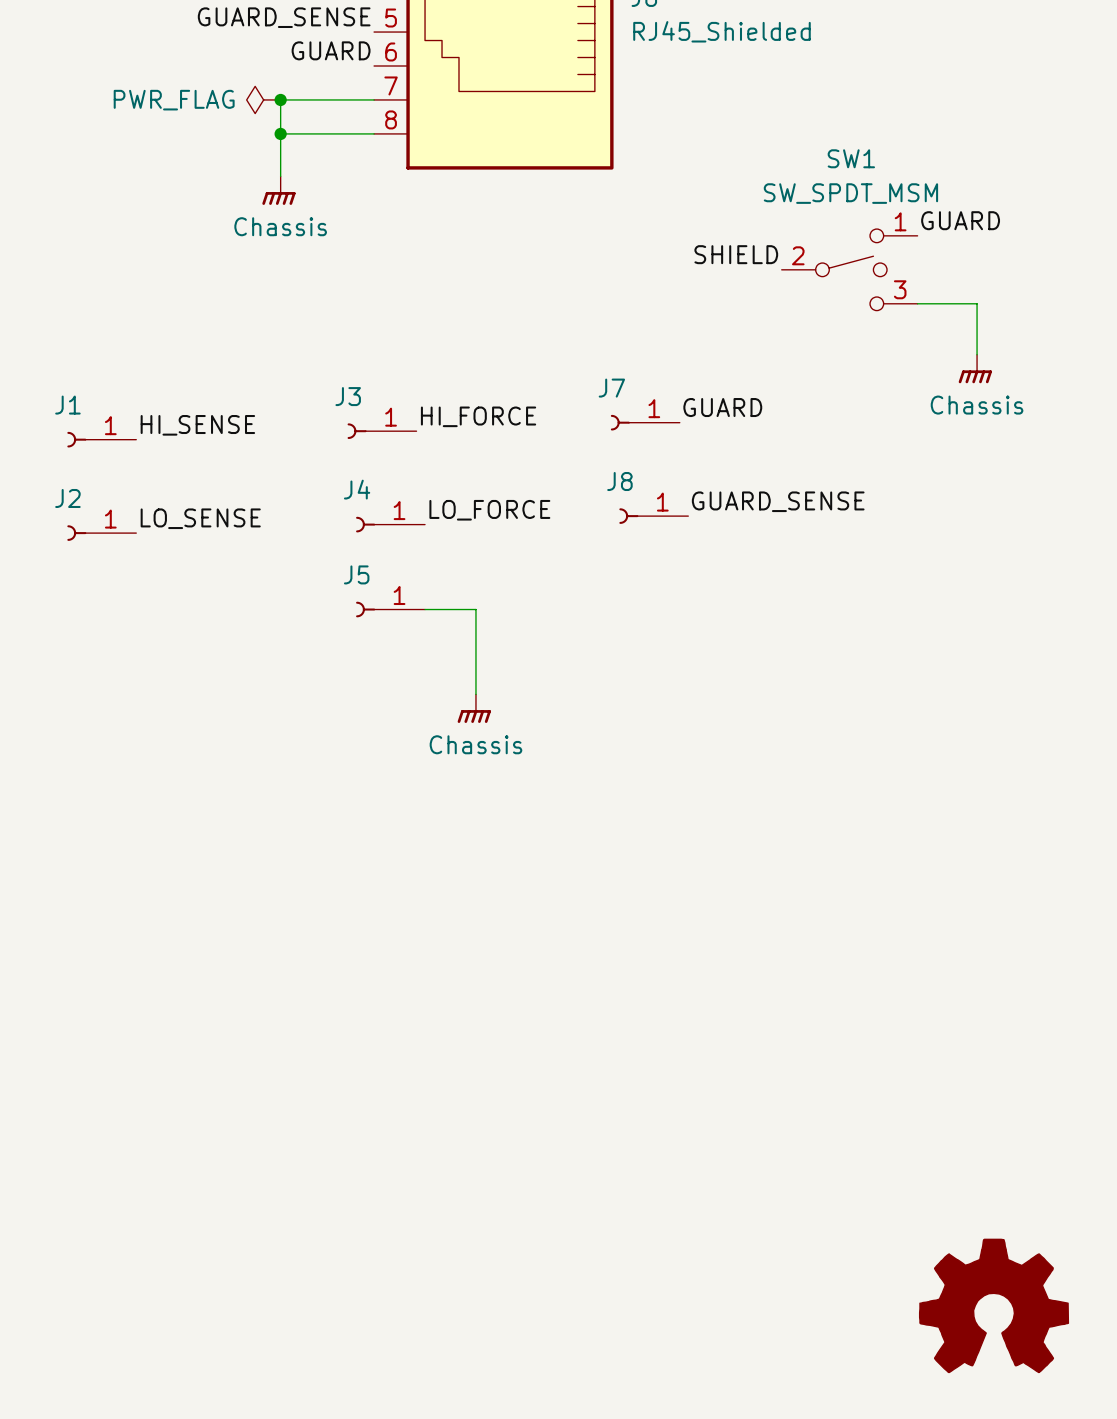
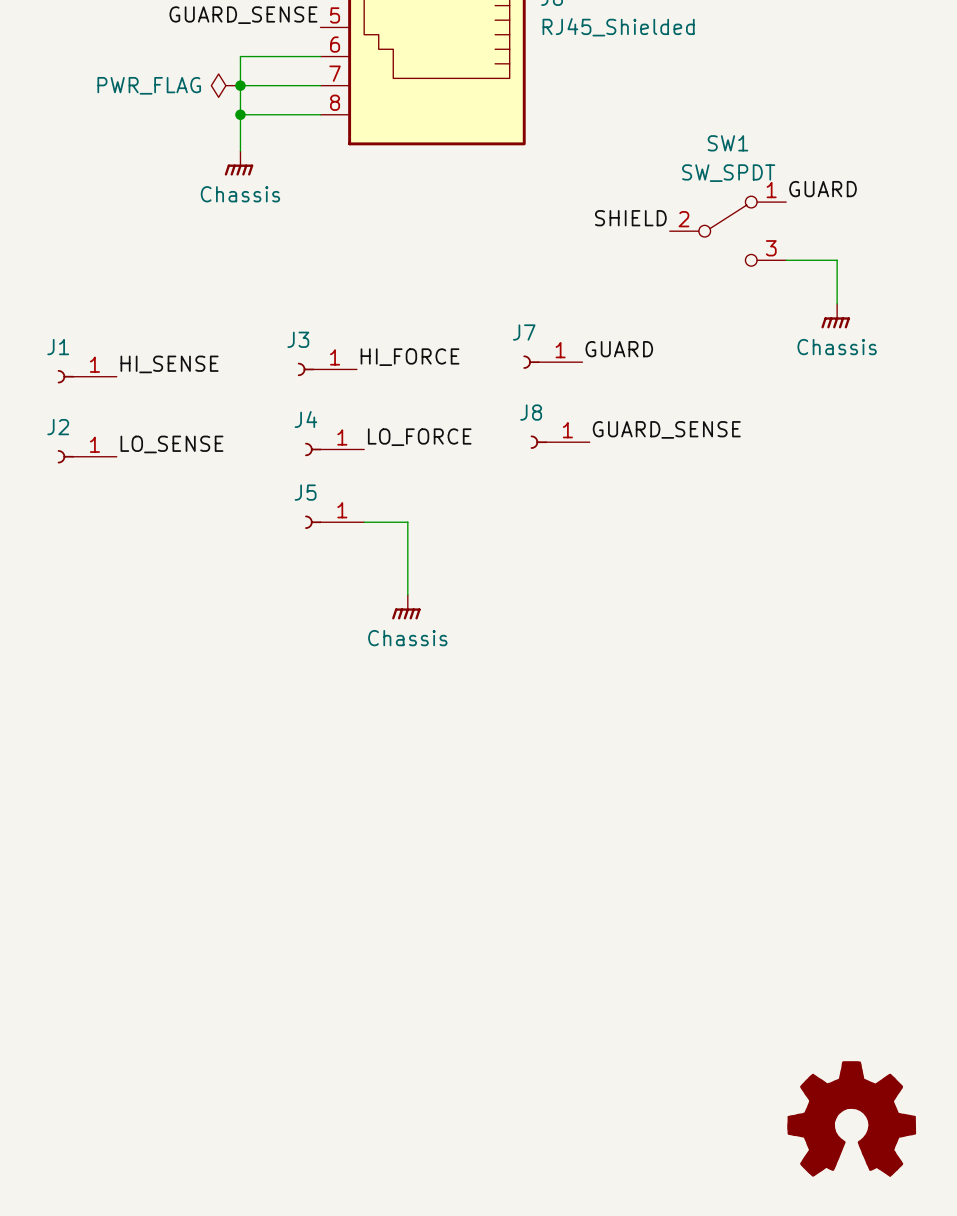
label: GUARD (331, 50) -> none
wire: none -> (320, 56) (240, 56) (240, 85)
SW1 value: SW_SPDT_MSM (850, 193) -> SW_SPDT (728, 173)
SW1 symbol: [781, 229, 918, 311] -> [669, 196, 787, 267]

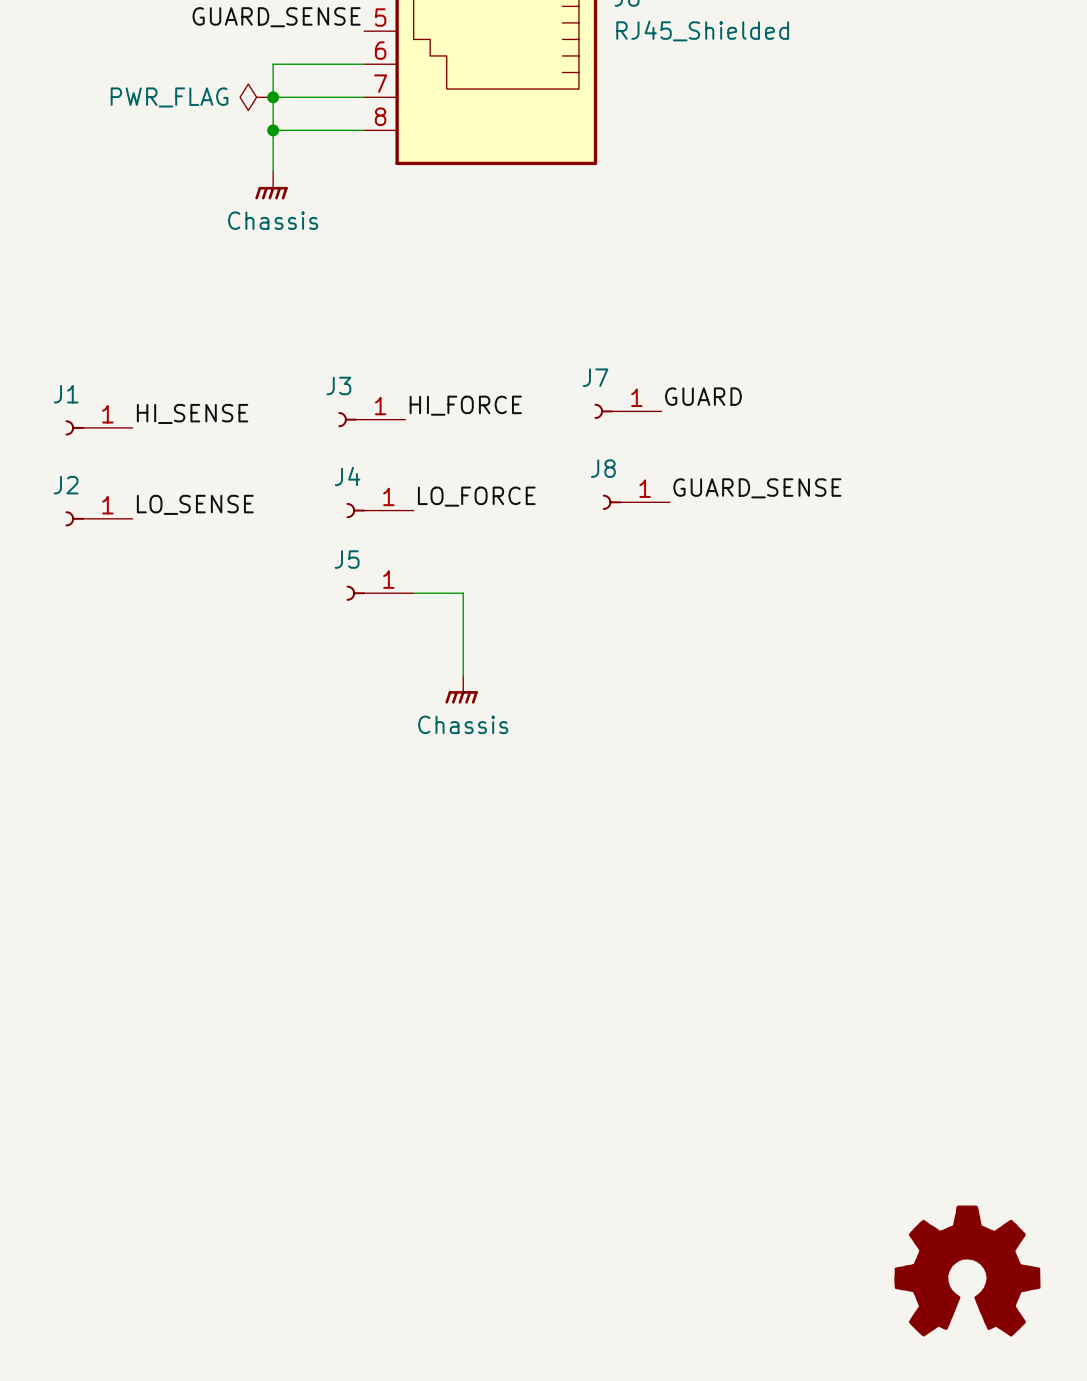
label: GUARD (823, 189) -> none
label: SHIELD (630, 218) -> none
SW1: SW_SPDT (727, 231) -> none
wire: (786, 260) (837, 260) (837, 303) -> none
power symbol: (835, 316) -> none

